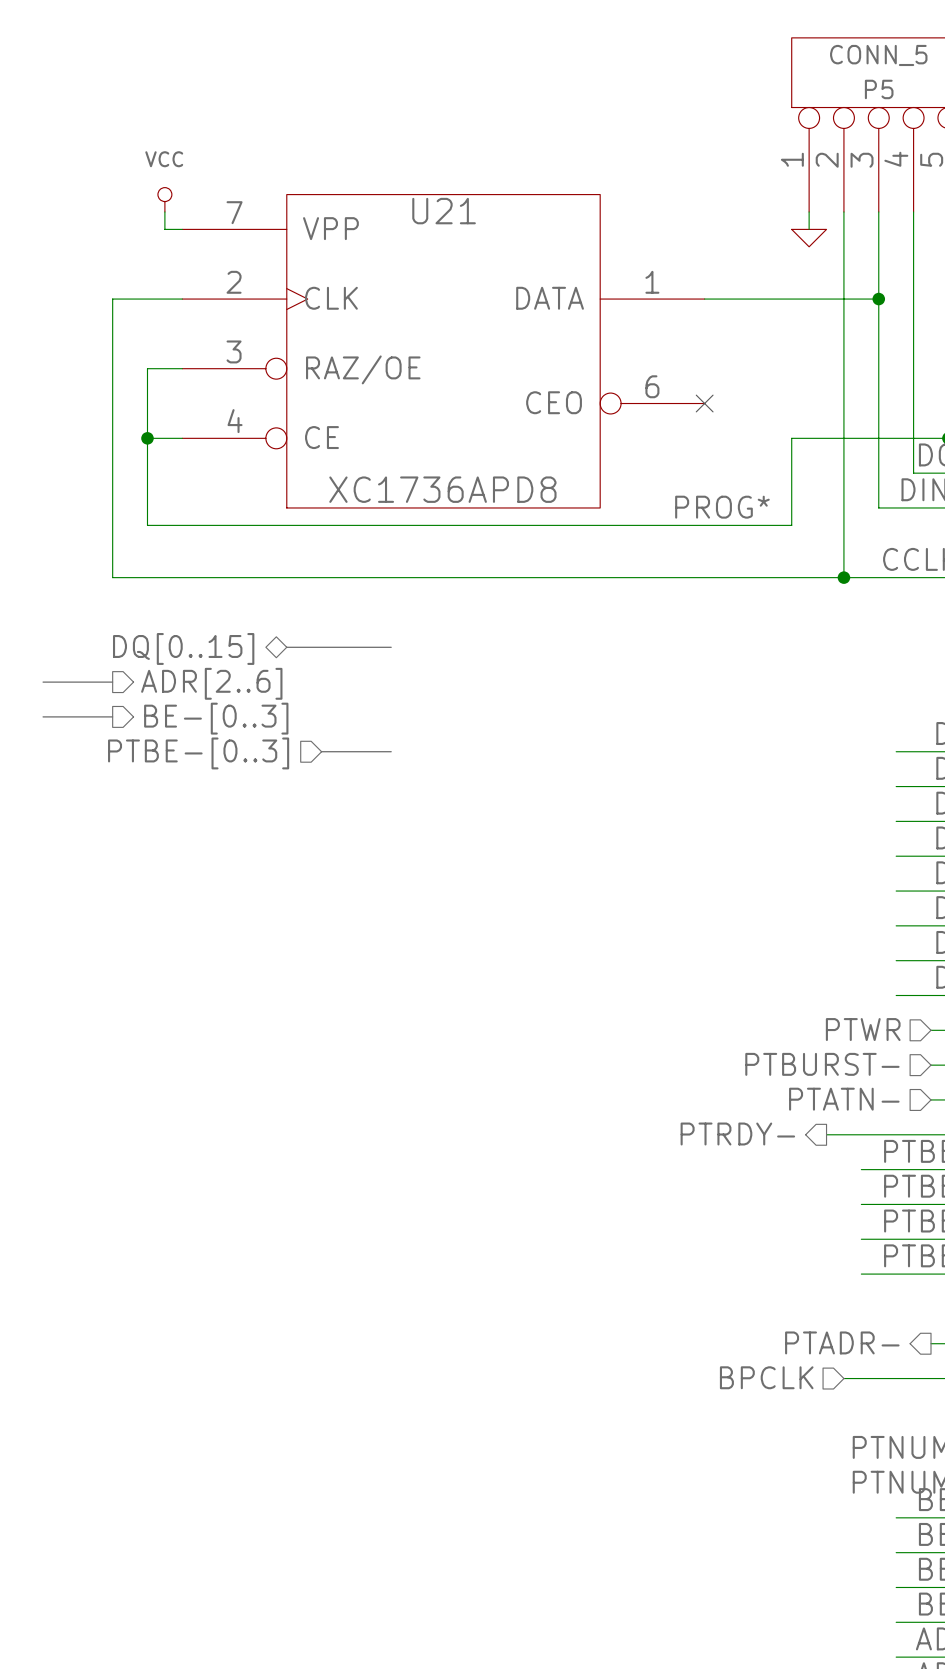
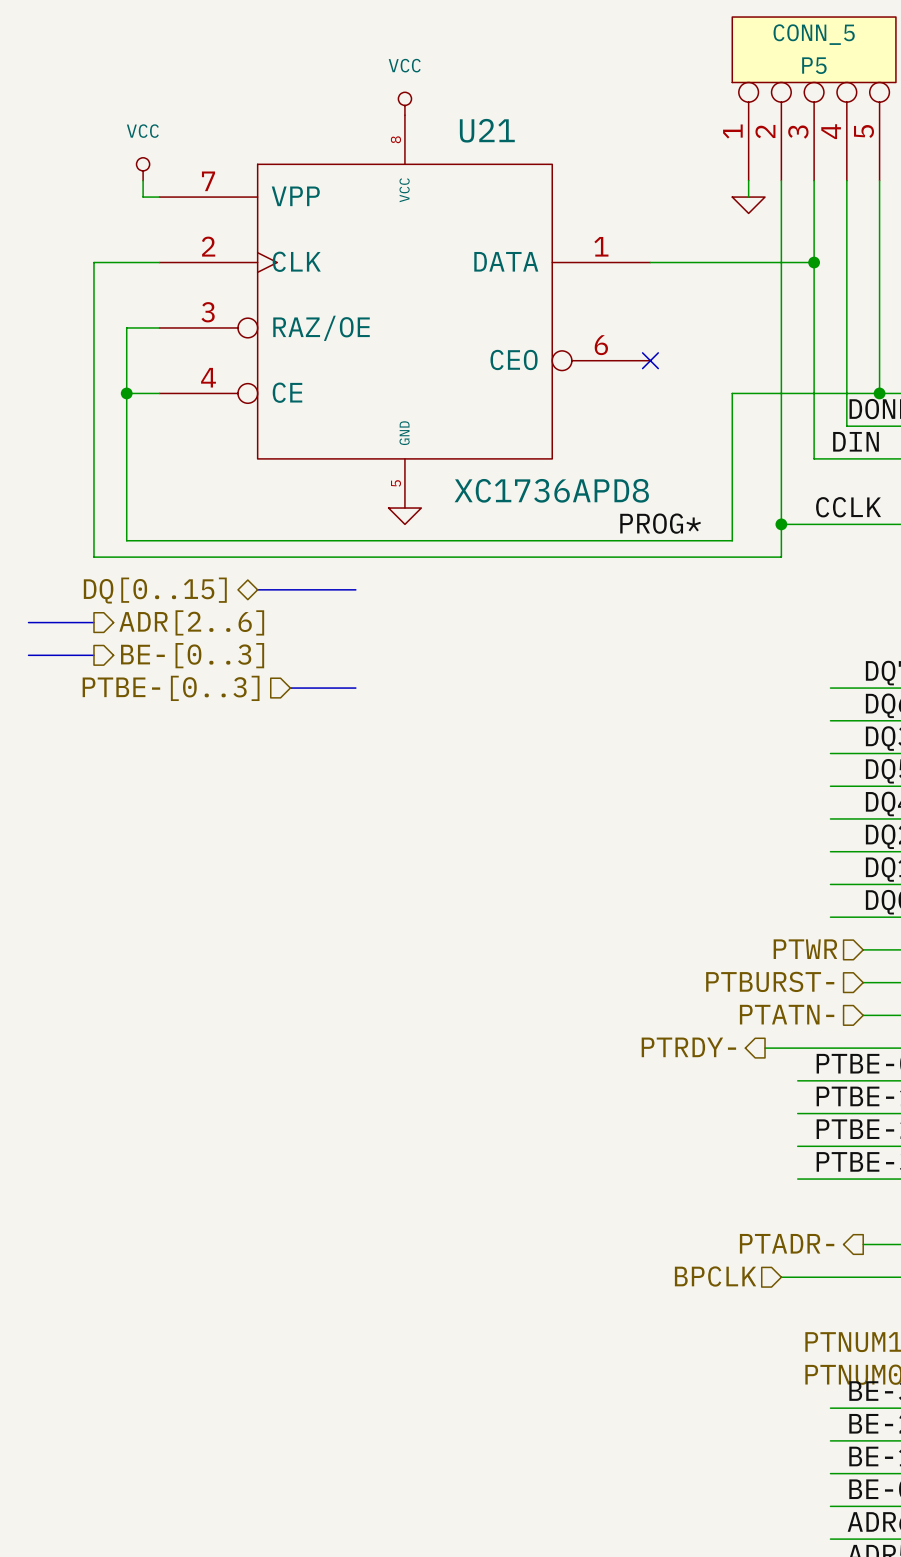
power symbol: none -> VCC (404, 103)
U21 symbol: [182, 194, 705, 508] -> [159, 115, 651, 509]
U21 name position: U21 (444, 211) -> U21 (487, 130)
U21 value position: XC1736APD8 (442, 489) -> XC1736APD8 (551, 490)
label position: PROG* (722, 507) -> PROG* (660, 523)
wire: (147, 525) (791, 525) -> (126, 475) (126, 540) (732, 540) (732, 475)
power symbol: none -> (404, 516)
wire: (112, 577) (843, 577) -> (93, 524) (93, 557) (781, 557) (781, 524)

